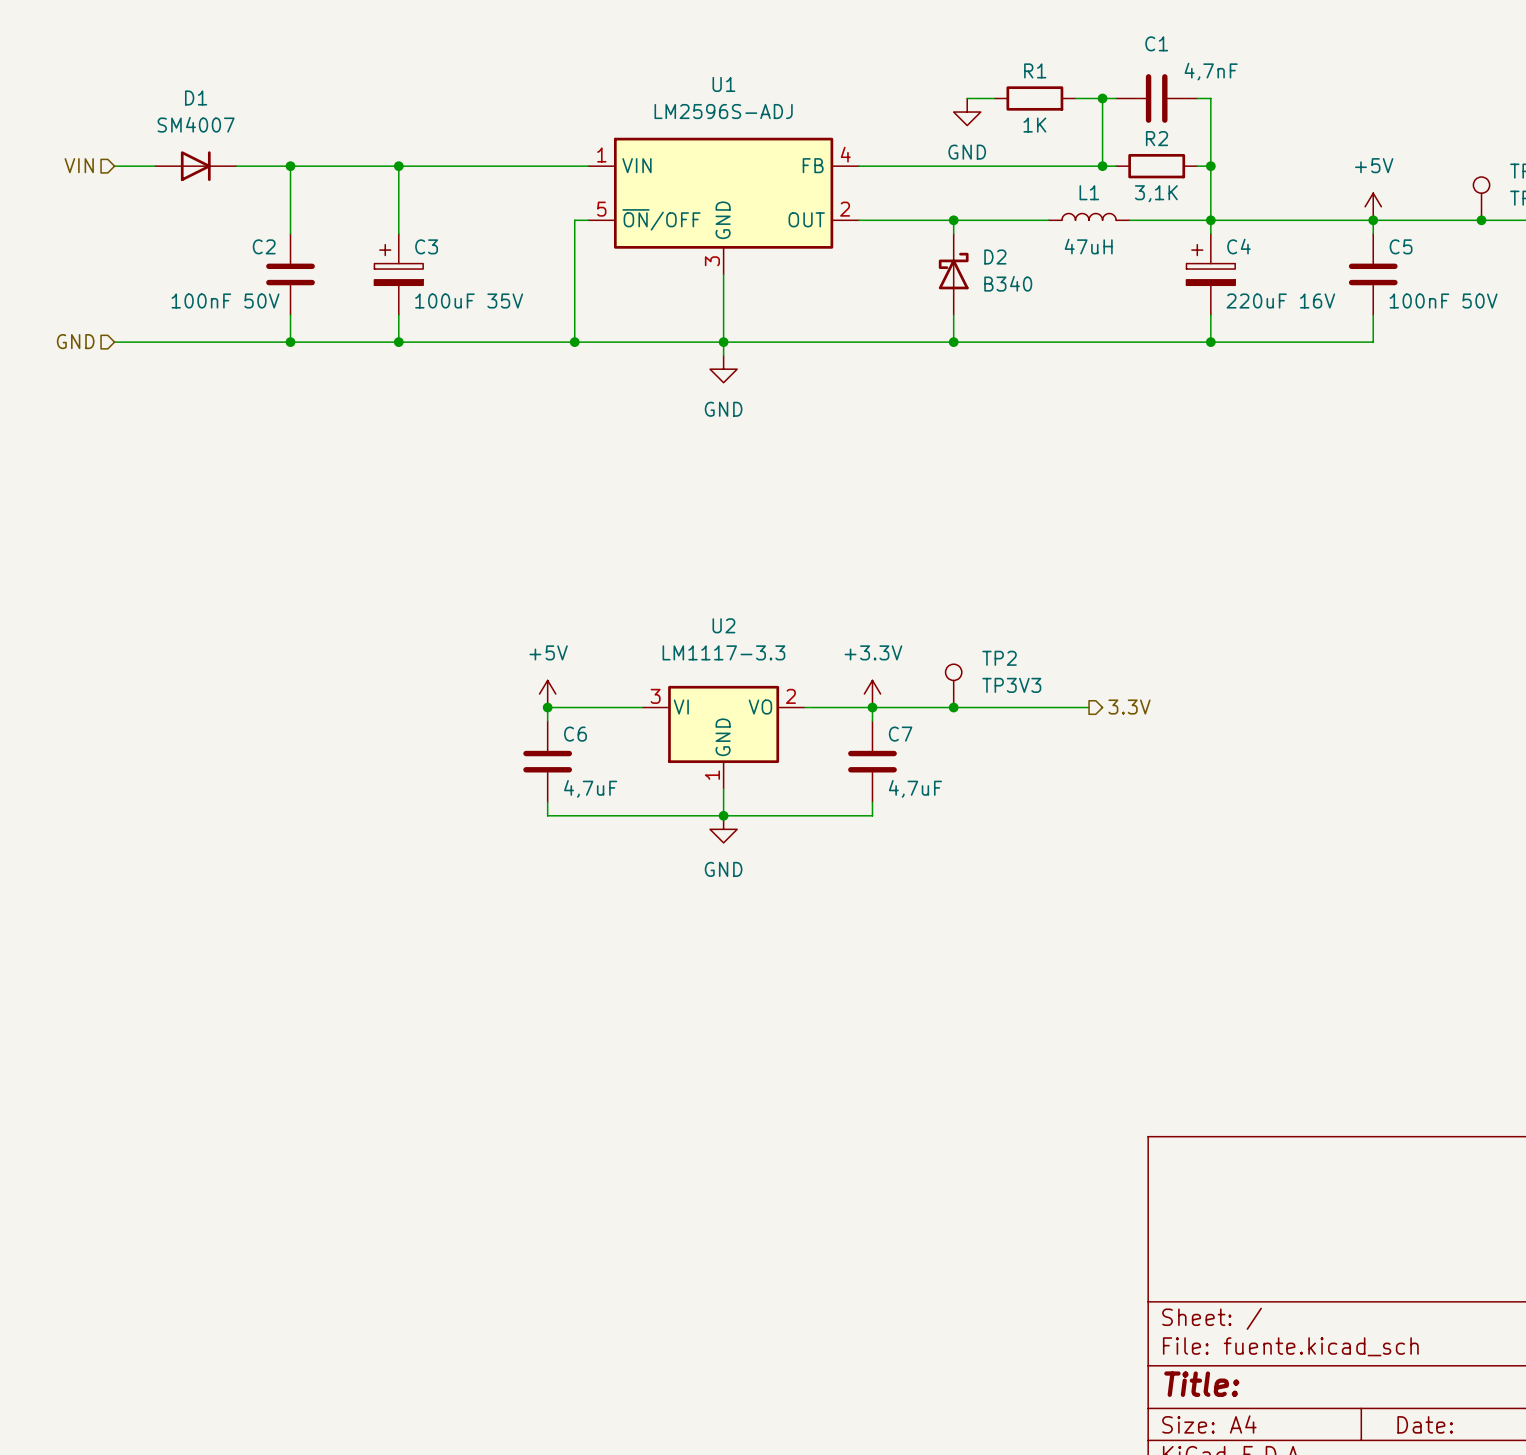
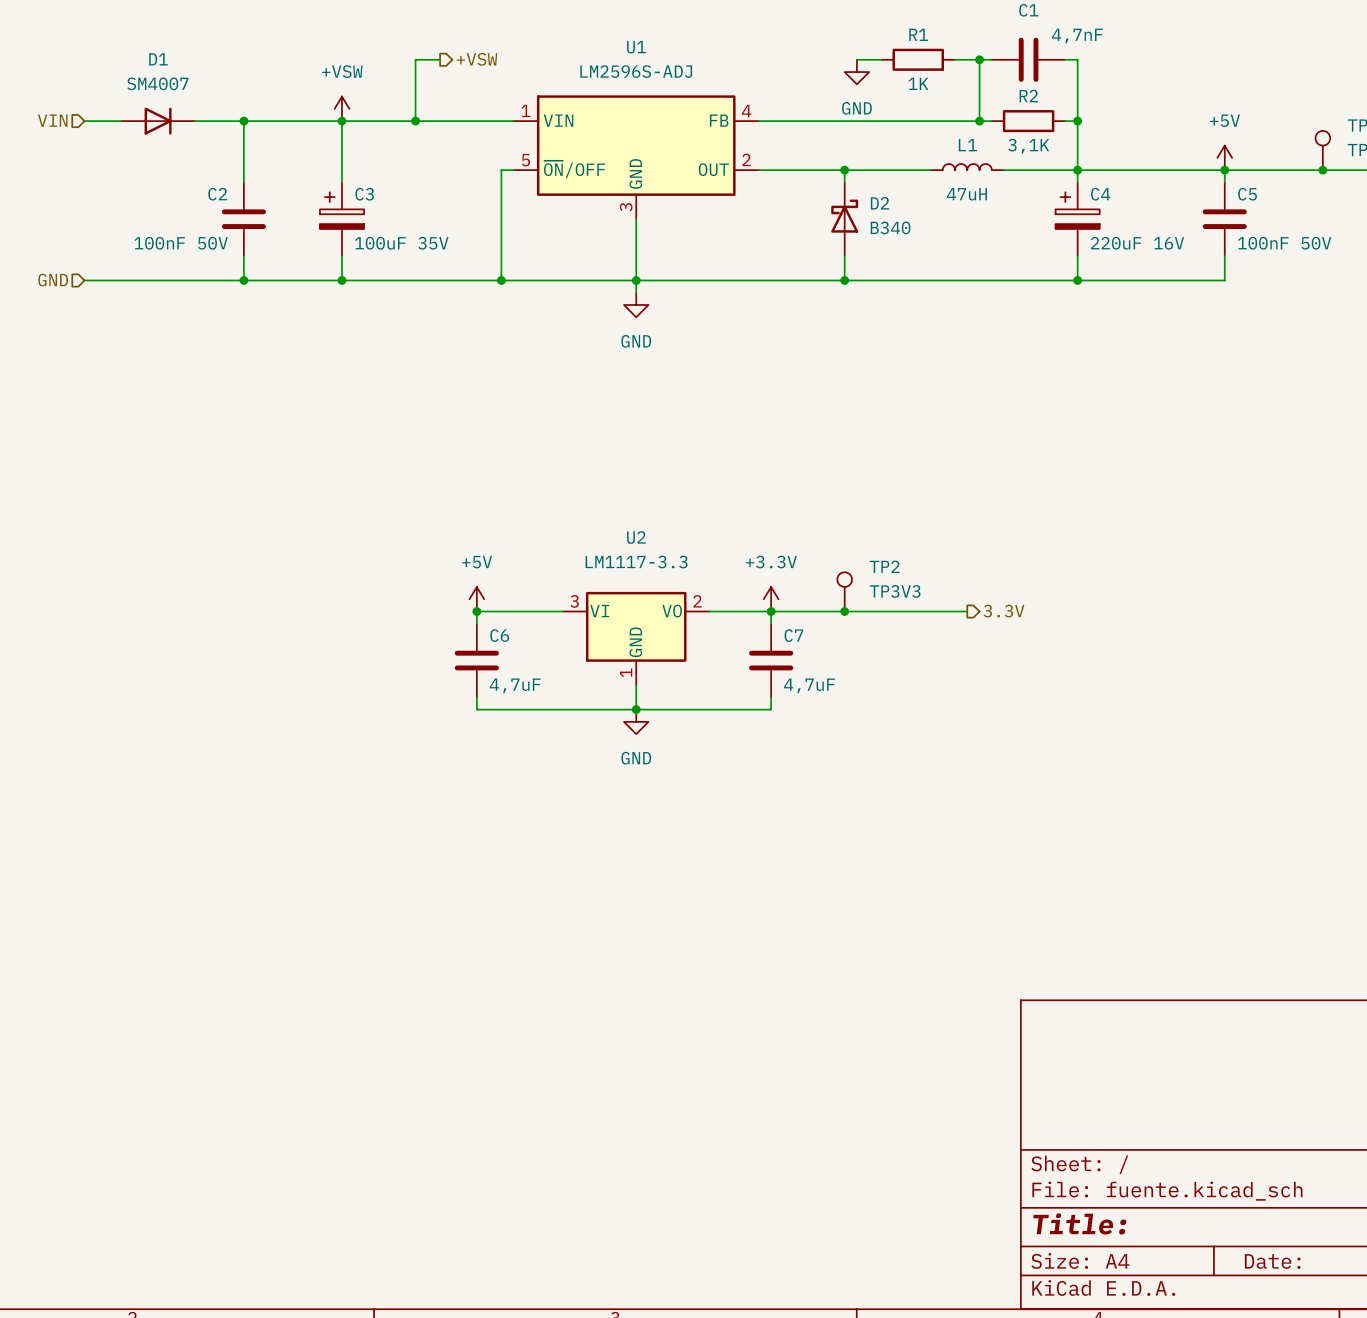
hierarchical label: none -> +VSW (476, 59)
wire: none -> (440, 59) (415, 59) (415, 121)
power symbol: none -> +VSW (341, 108)
junction: none -> (415, 121)

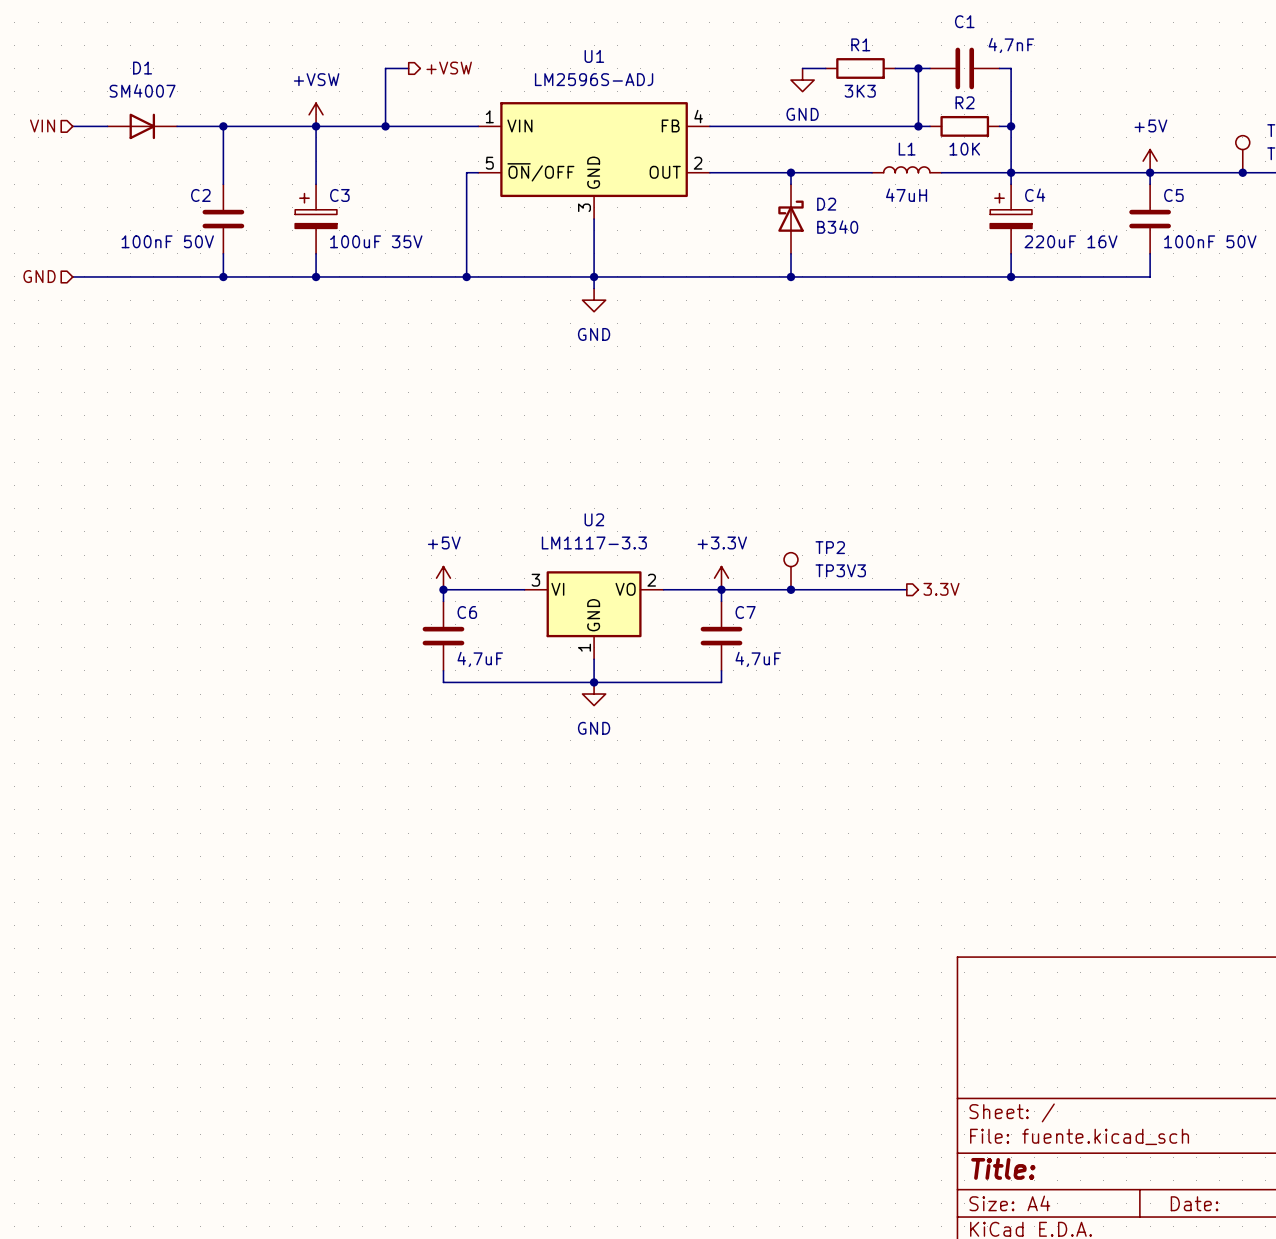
R1 value: 1K (918, 83) -> 3K3 (860, 91)
R2 value: 3,1K (1028, 146) -> 10K (964, 149)

